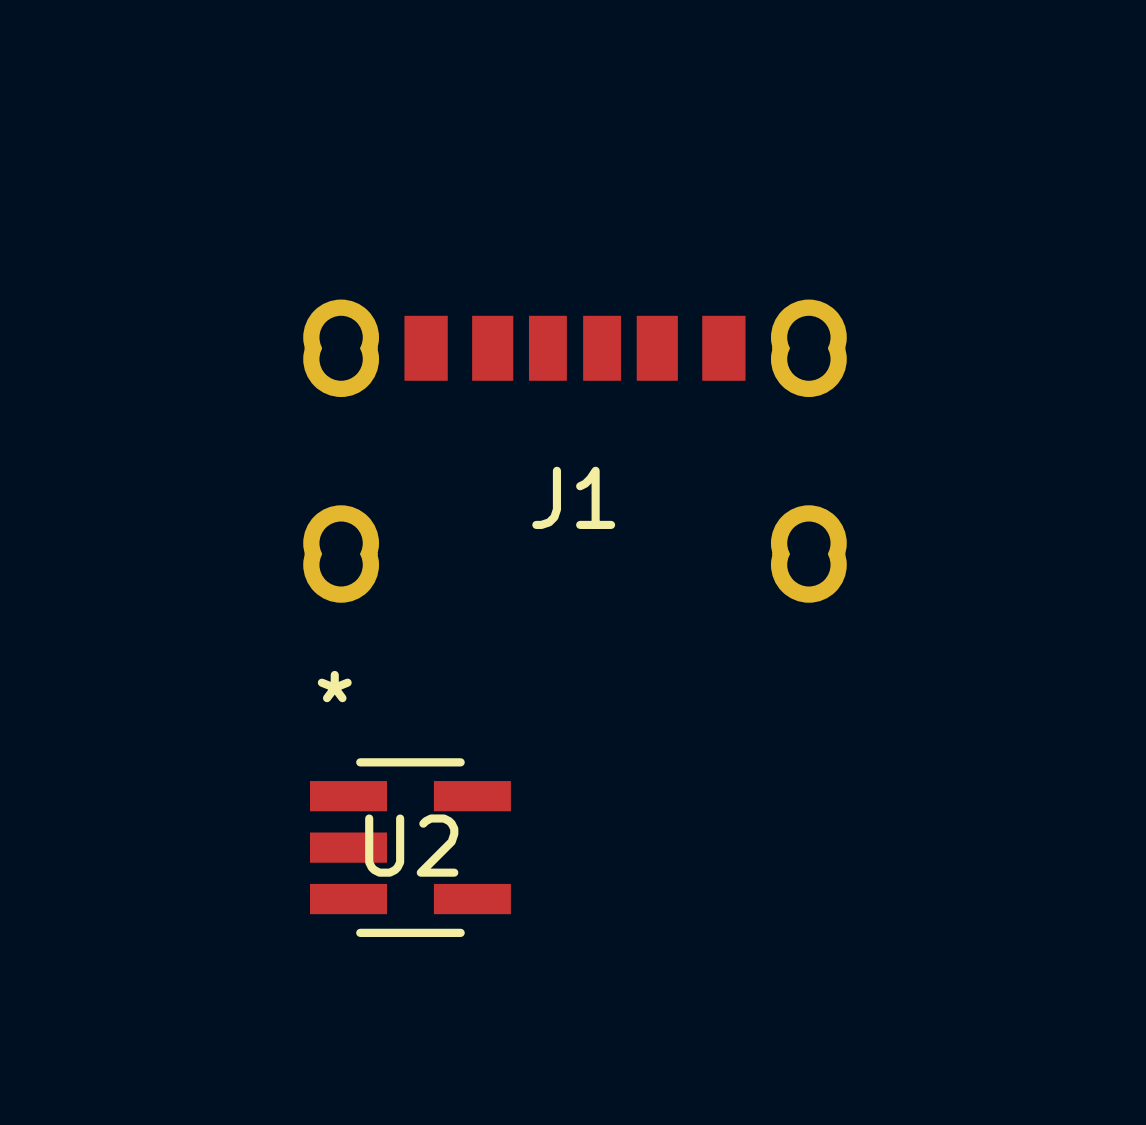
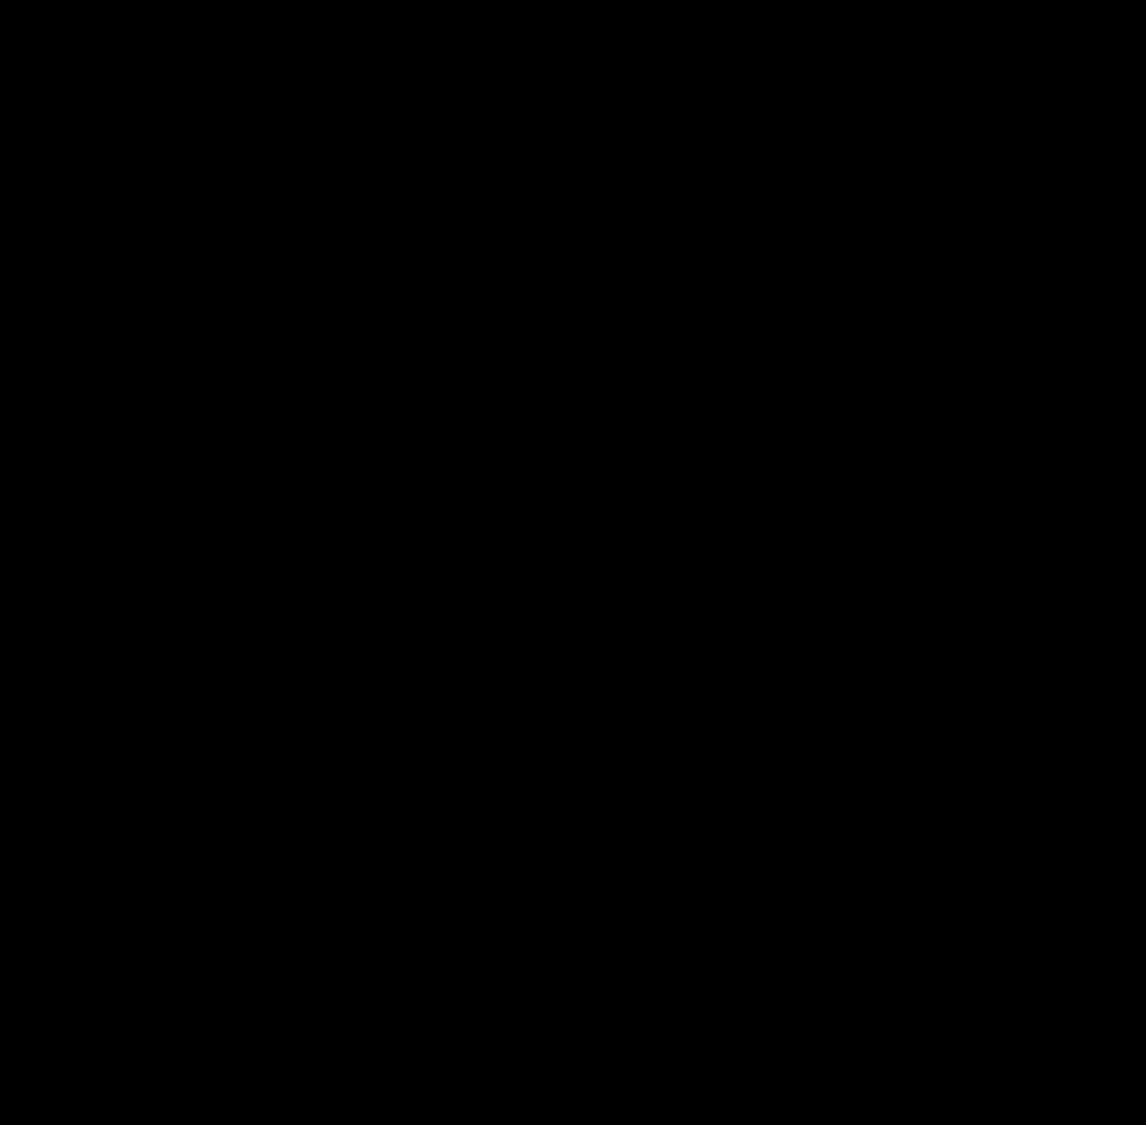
J1: (575, 451) -> none
U2: (410, 847) -> none

